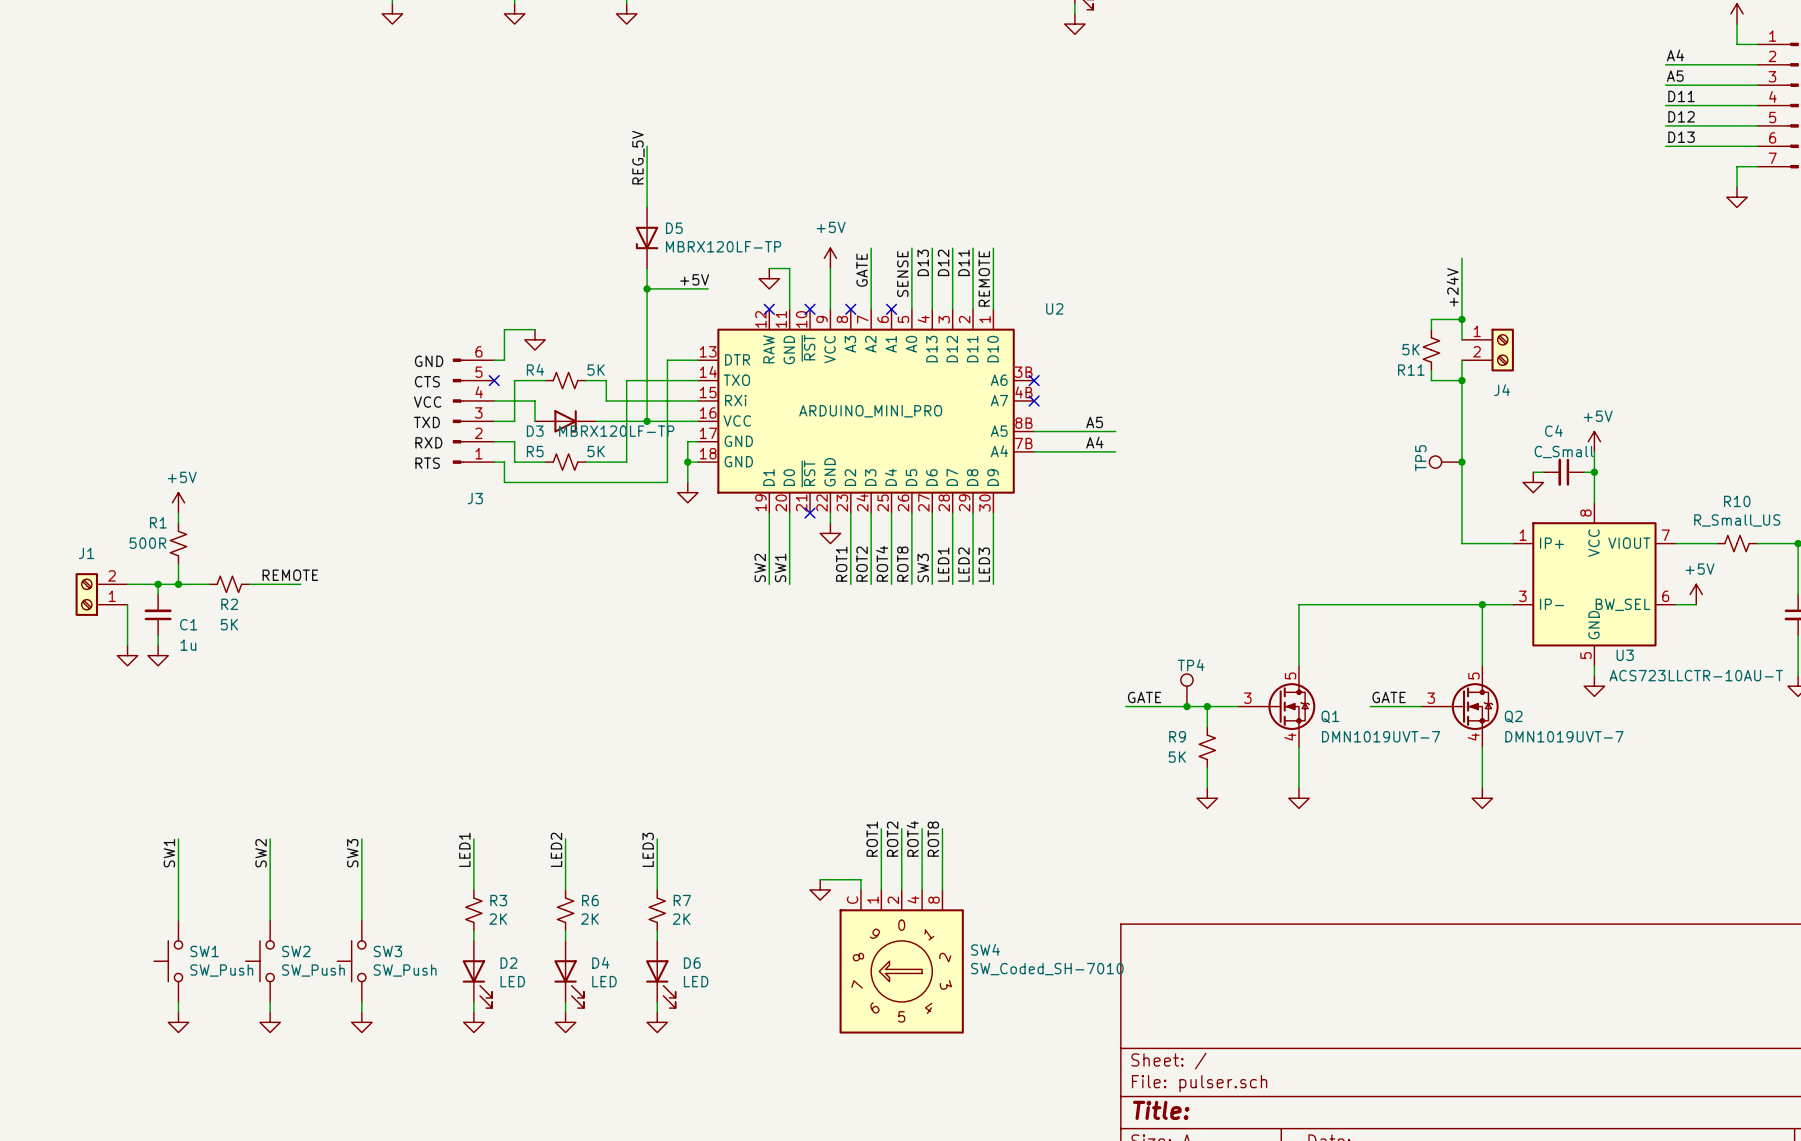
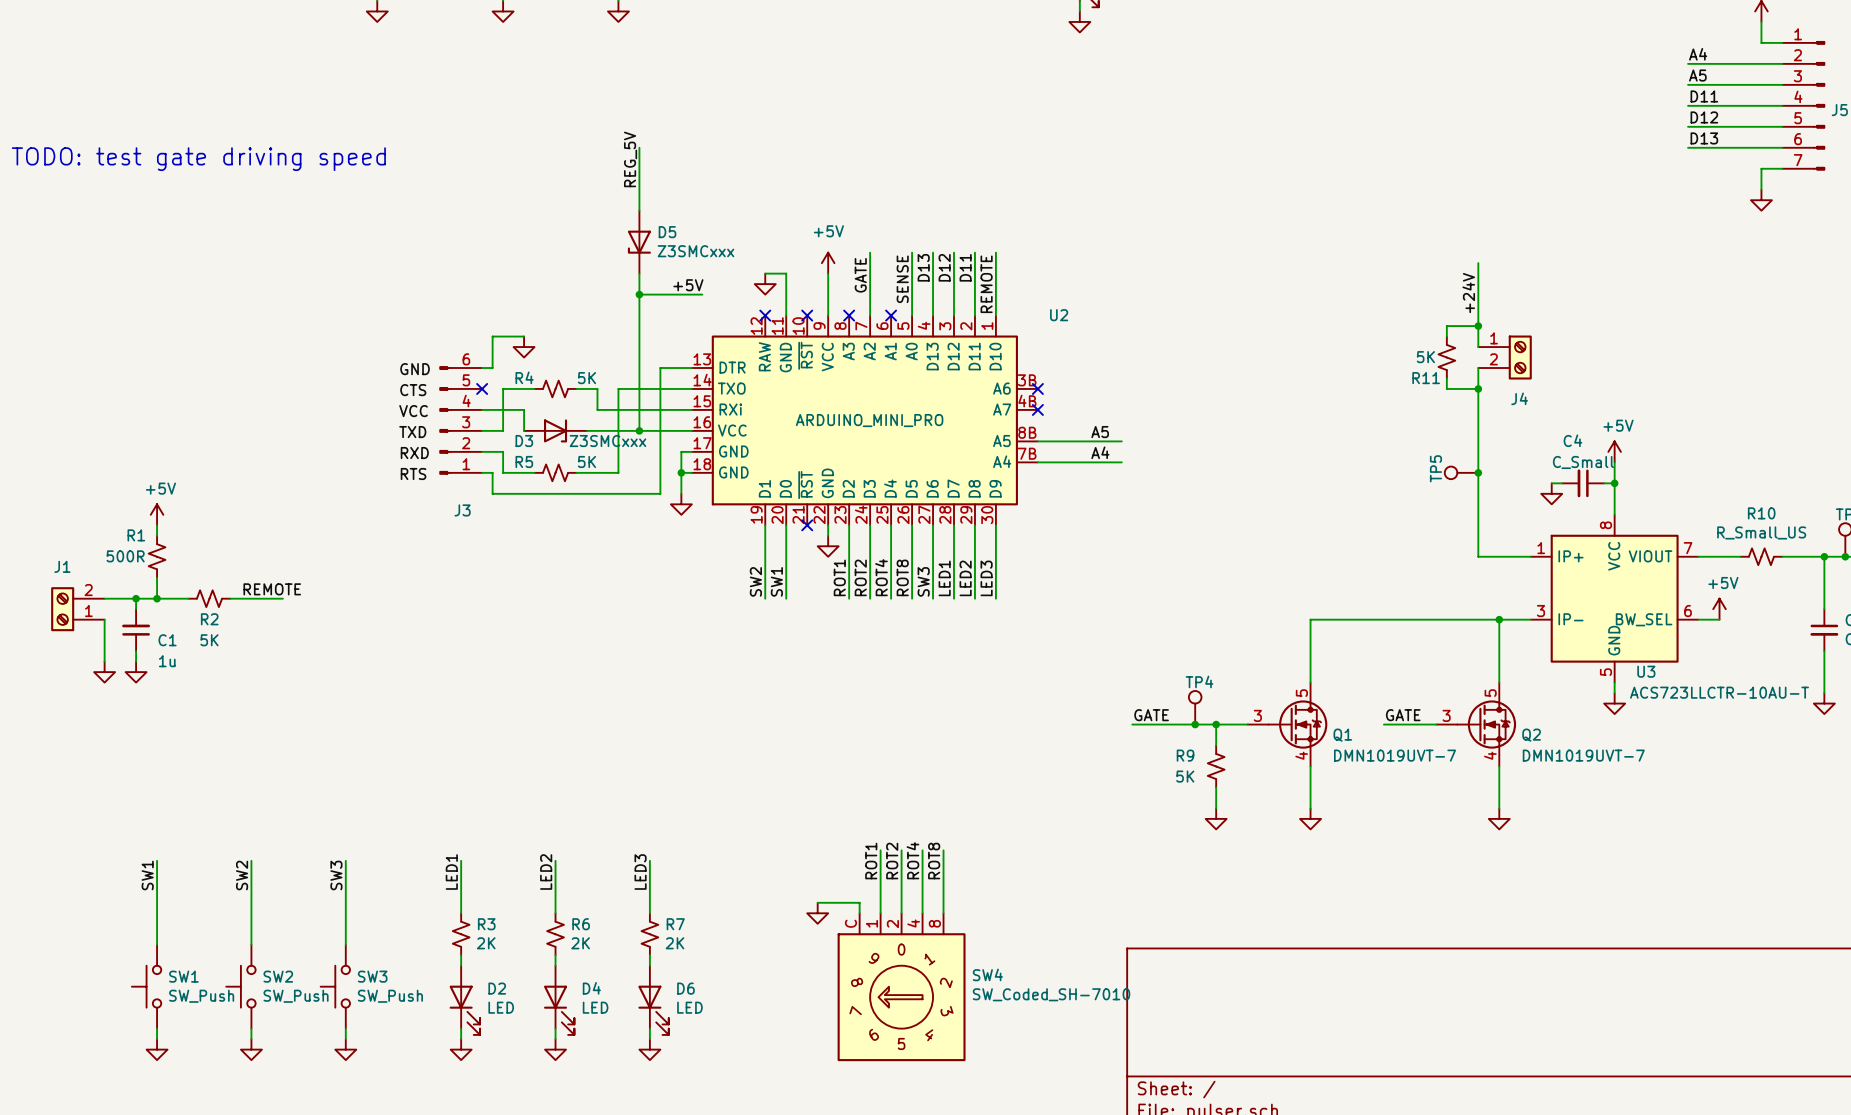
text: none -> TODO: test gate driving speed (198, 159)
D5 value: MBRX120LF-TP (723, 246) -> Z3SMCxxx (695, 251)
D3 value: MBRX120LF-TP (616, 431) -> Z3SMCxxx (607, 441)

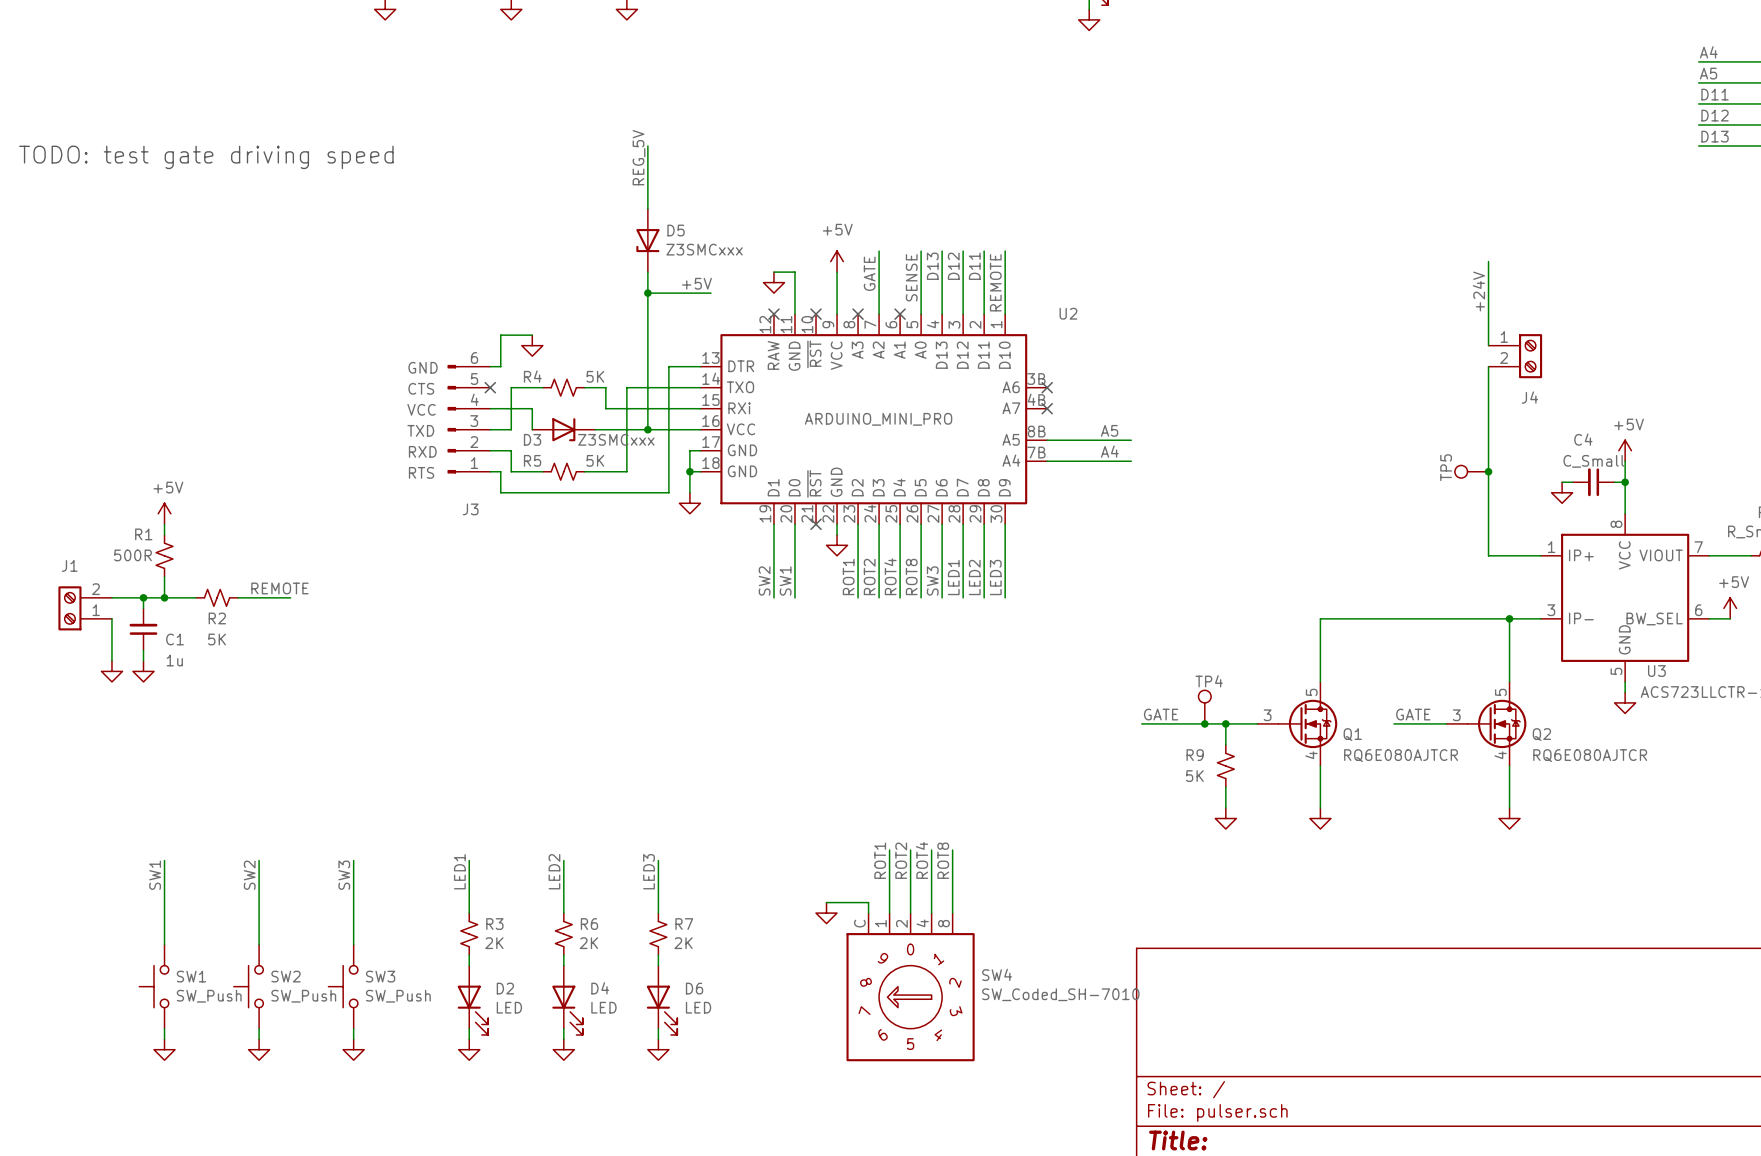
wire: (1478, 326) (1446, 326) (1446, 336) -> none
junction: (1478, 326) -> none
R11: 5K (1446, 357) -> none
wire: (1446, 378) (1446, 388) (1478, 388) -> none
junction: (1478, 388) -> none
Q1 value: DMN1019UVT-7 (1395, 755) -> RQ6E080AJTCR (1401, 755)
Q2 value: DMN1019UVT-7 (1583, 755) -> RQ6E080AJTCR (1590, 755)

